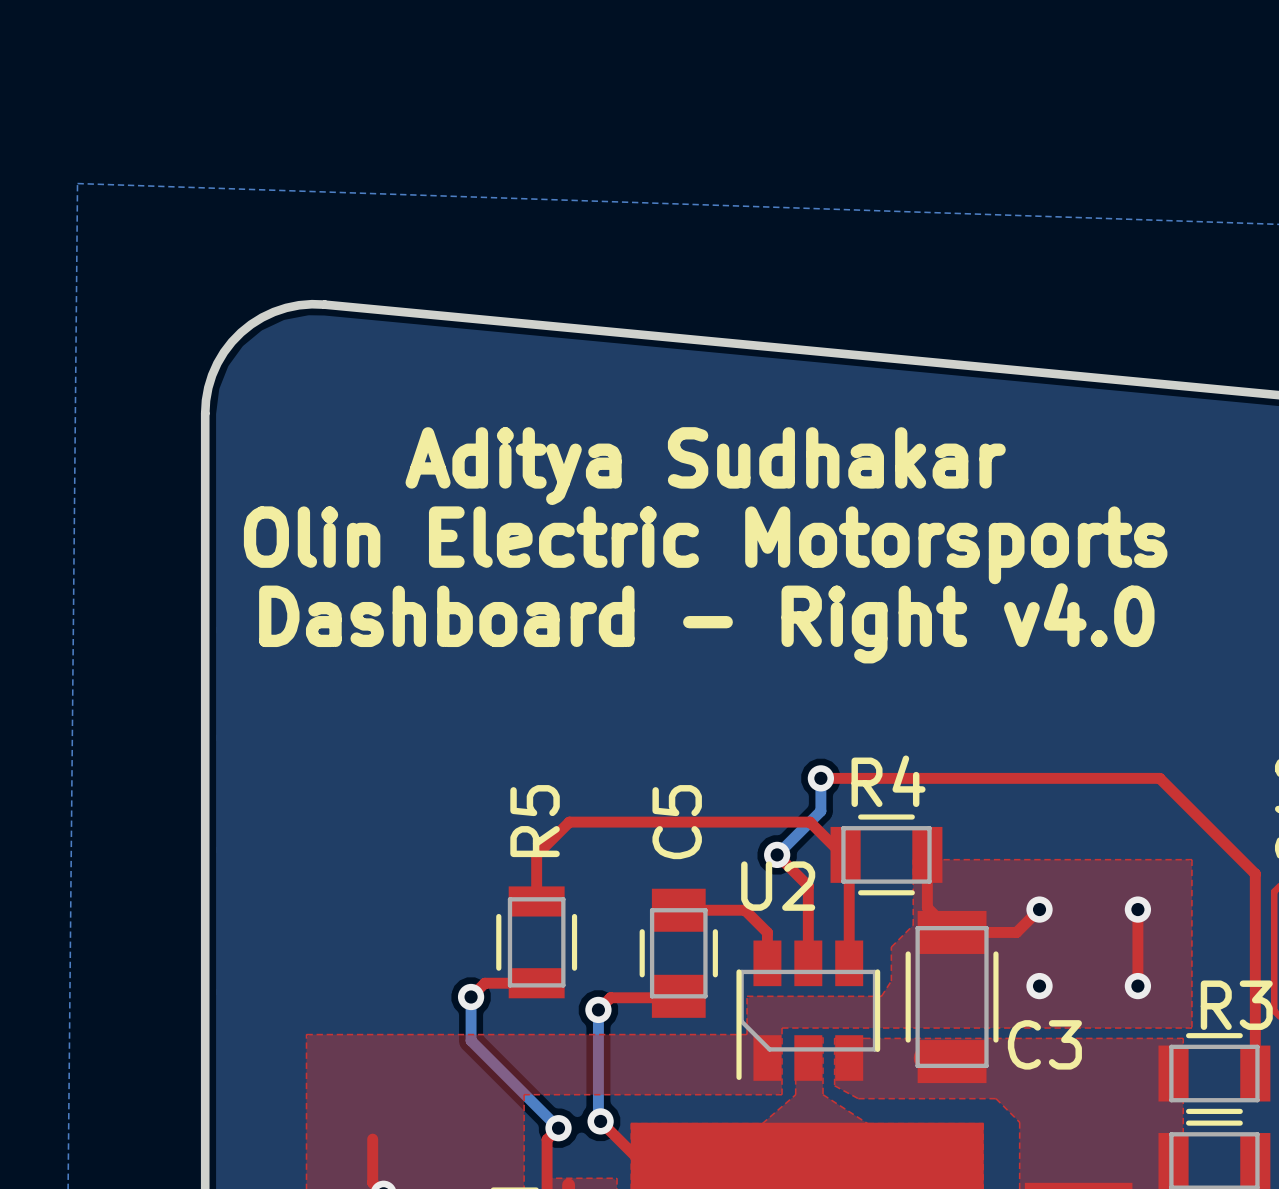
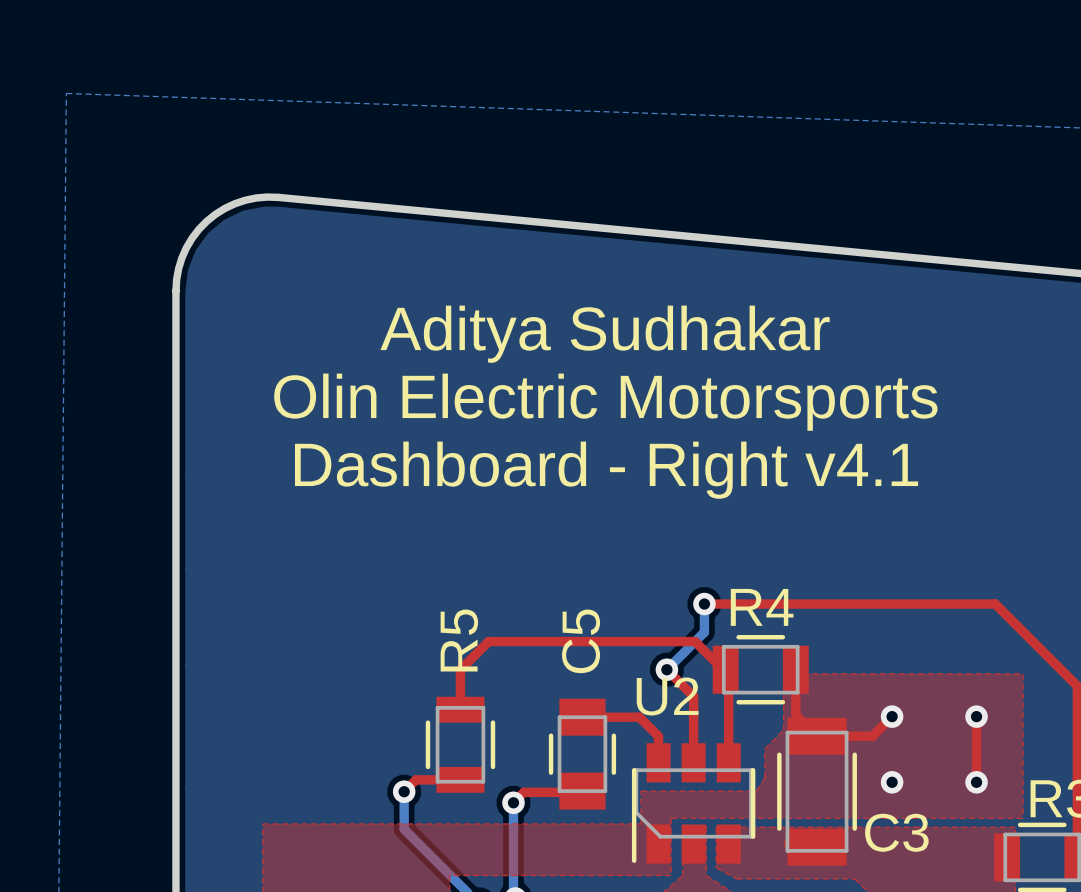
text: Dashboard - Right v4.0 (706, 623) -> Dashboard - Right v4.1 (606, 470)

